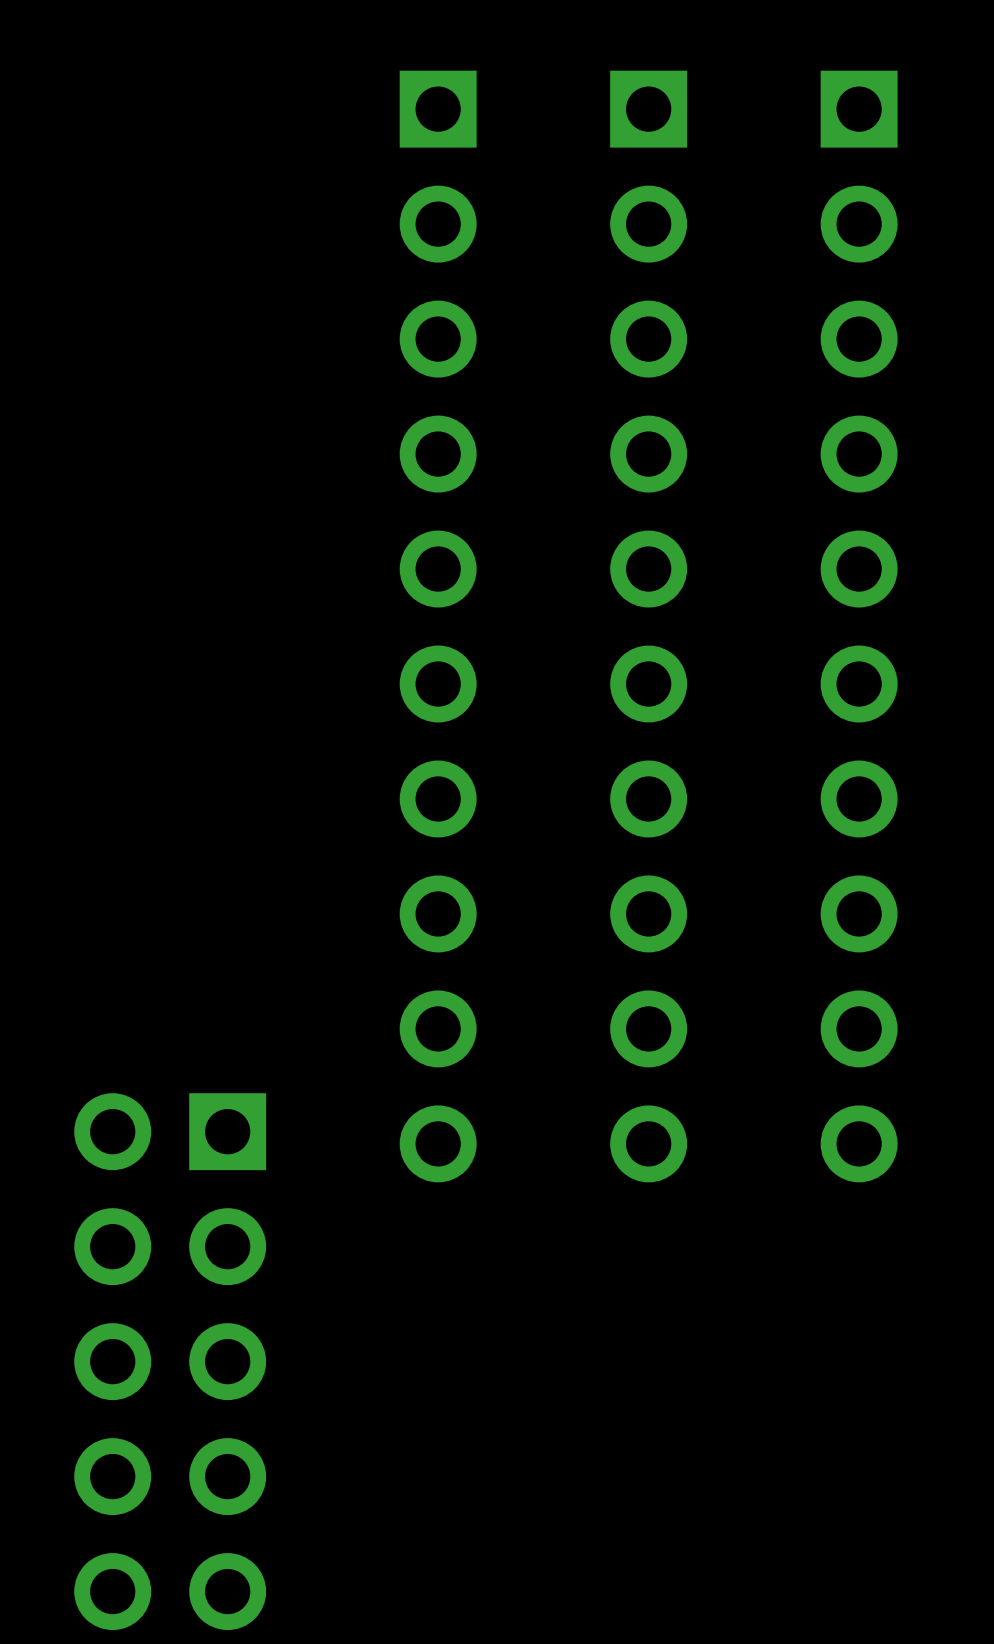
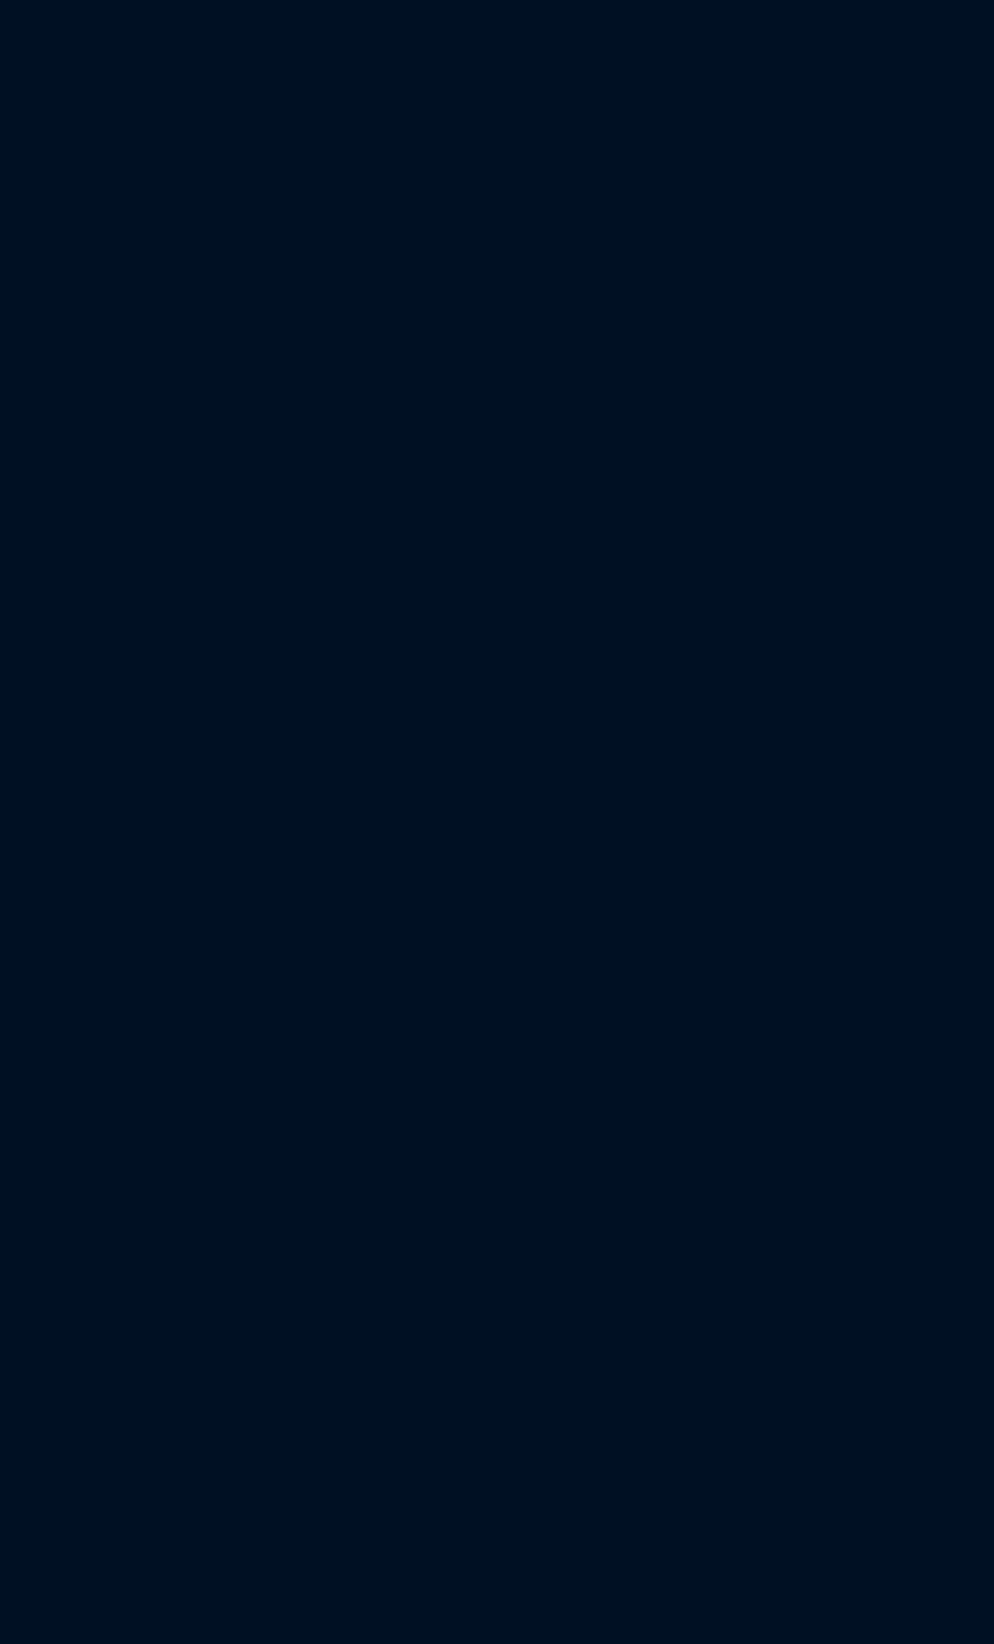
part: (438, 626) -> none
part: (648, 626) -> none
part: (859, 626) -> none
part: (170, 1361) -> none

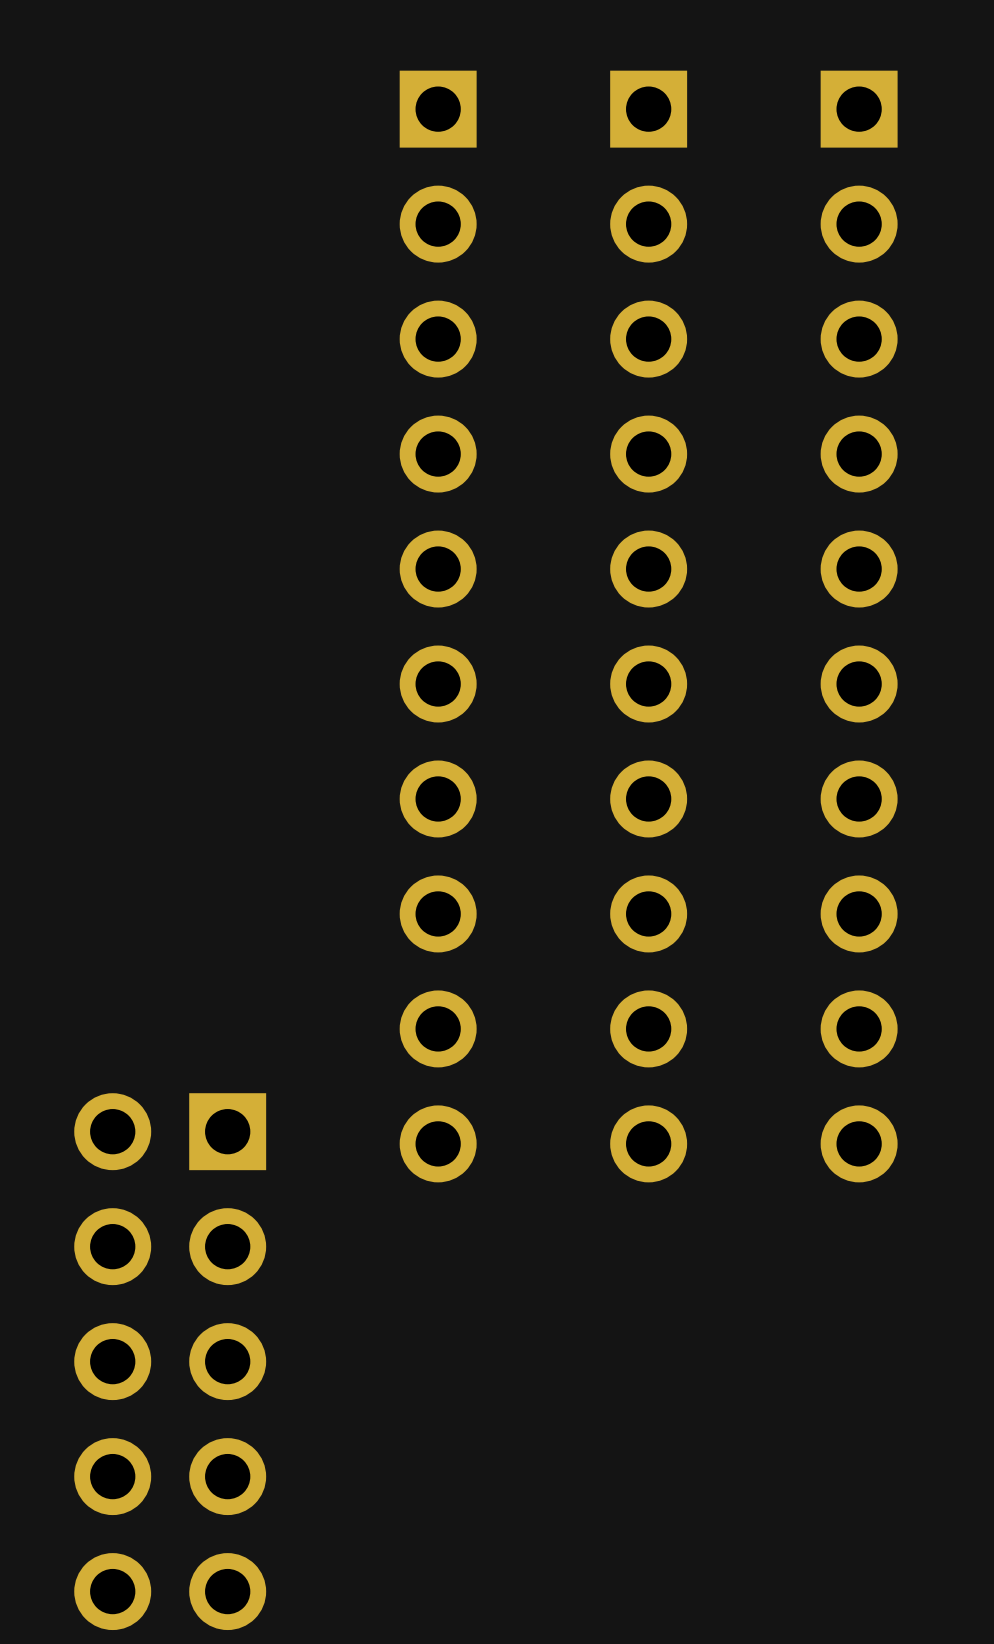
part: none -> (438, 626)
part: none -> (648, 626)
part: none -> (859, 626)
part: none -> (170, 1361)

